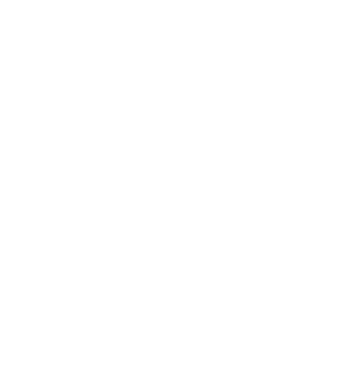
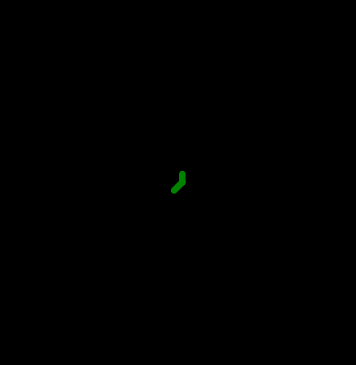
track: none -> (182, 174) (182, 182) (174, 190)

